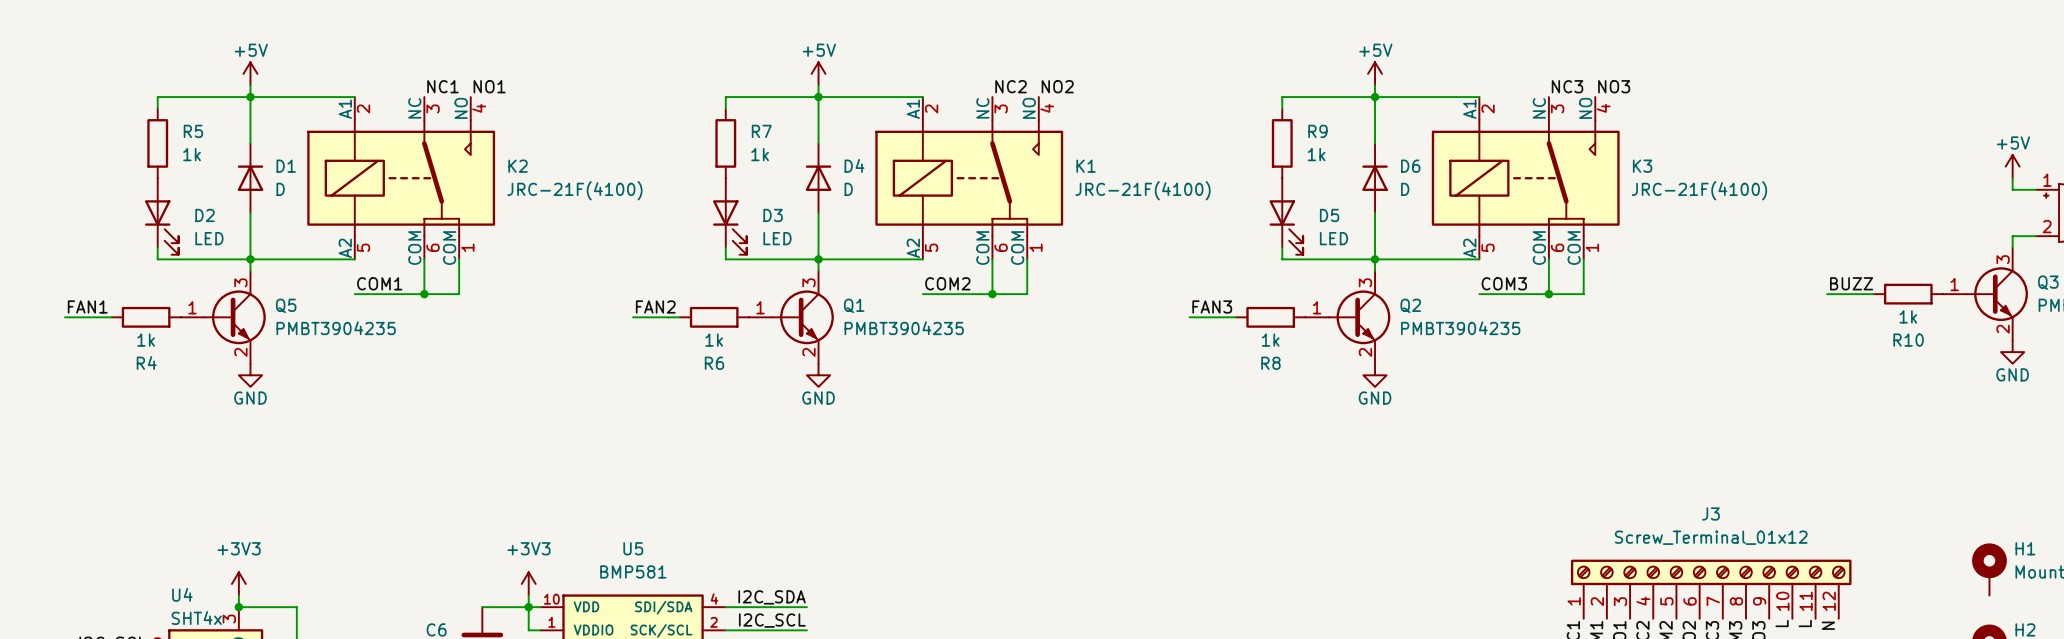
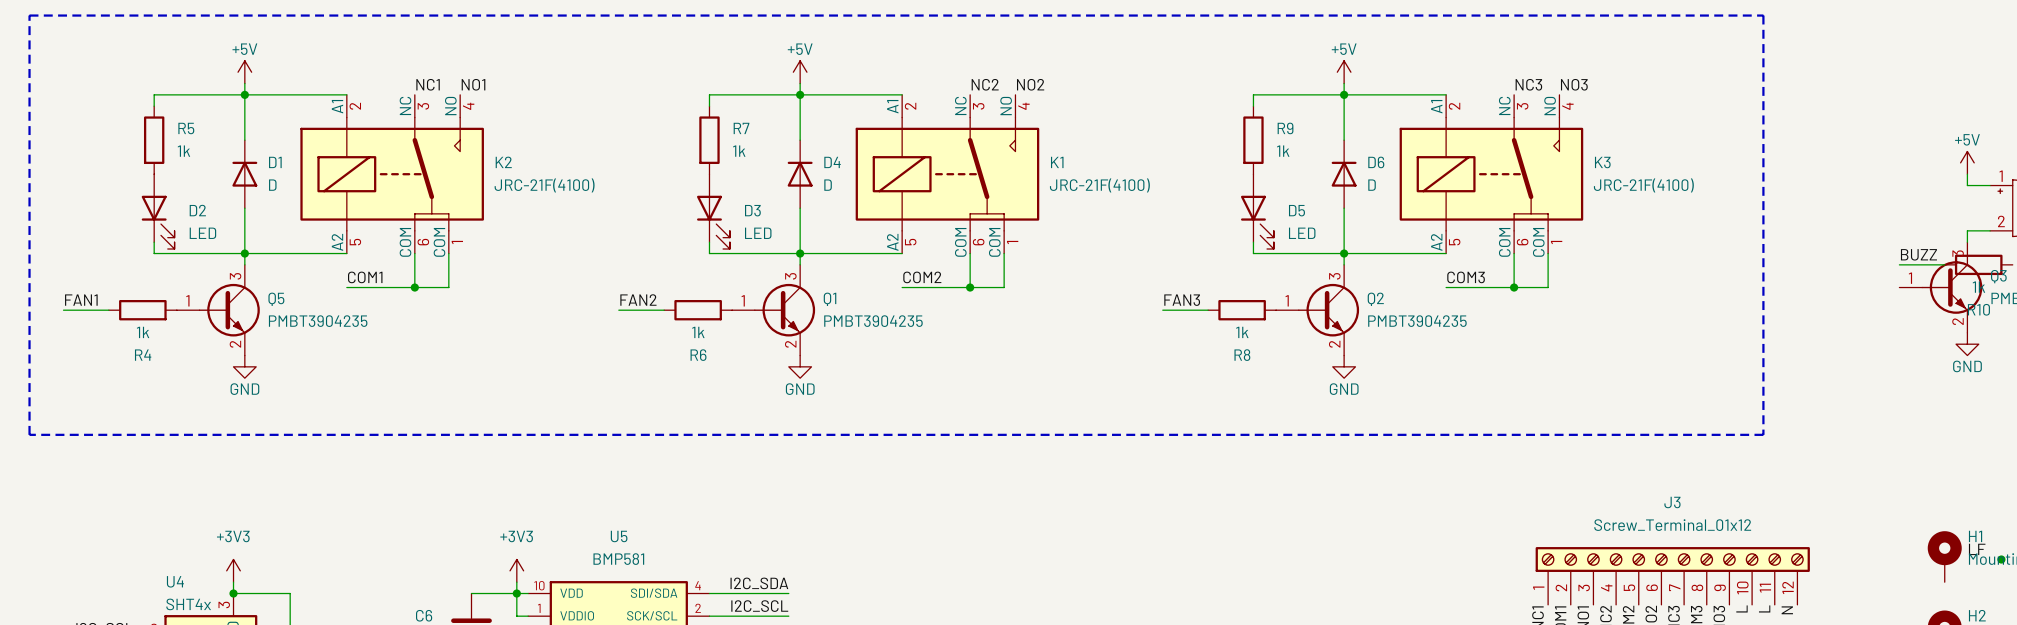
line: none -> (29, 15) (1763, 15) (1763, 434) (29, 434) (29, 15)
label position: BUZZ (1851, 283) -> BUZZ (1918, 254)
wire: (1827, 294) (1873, 294) -> (1899, 264) (1944, 264)
R10 position: (1908, 294) -> (1978, 264)
label: none -> LF (1977, 549)
junction: none -> (2001, 559)

